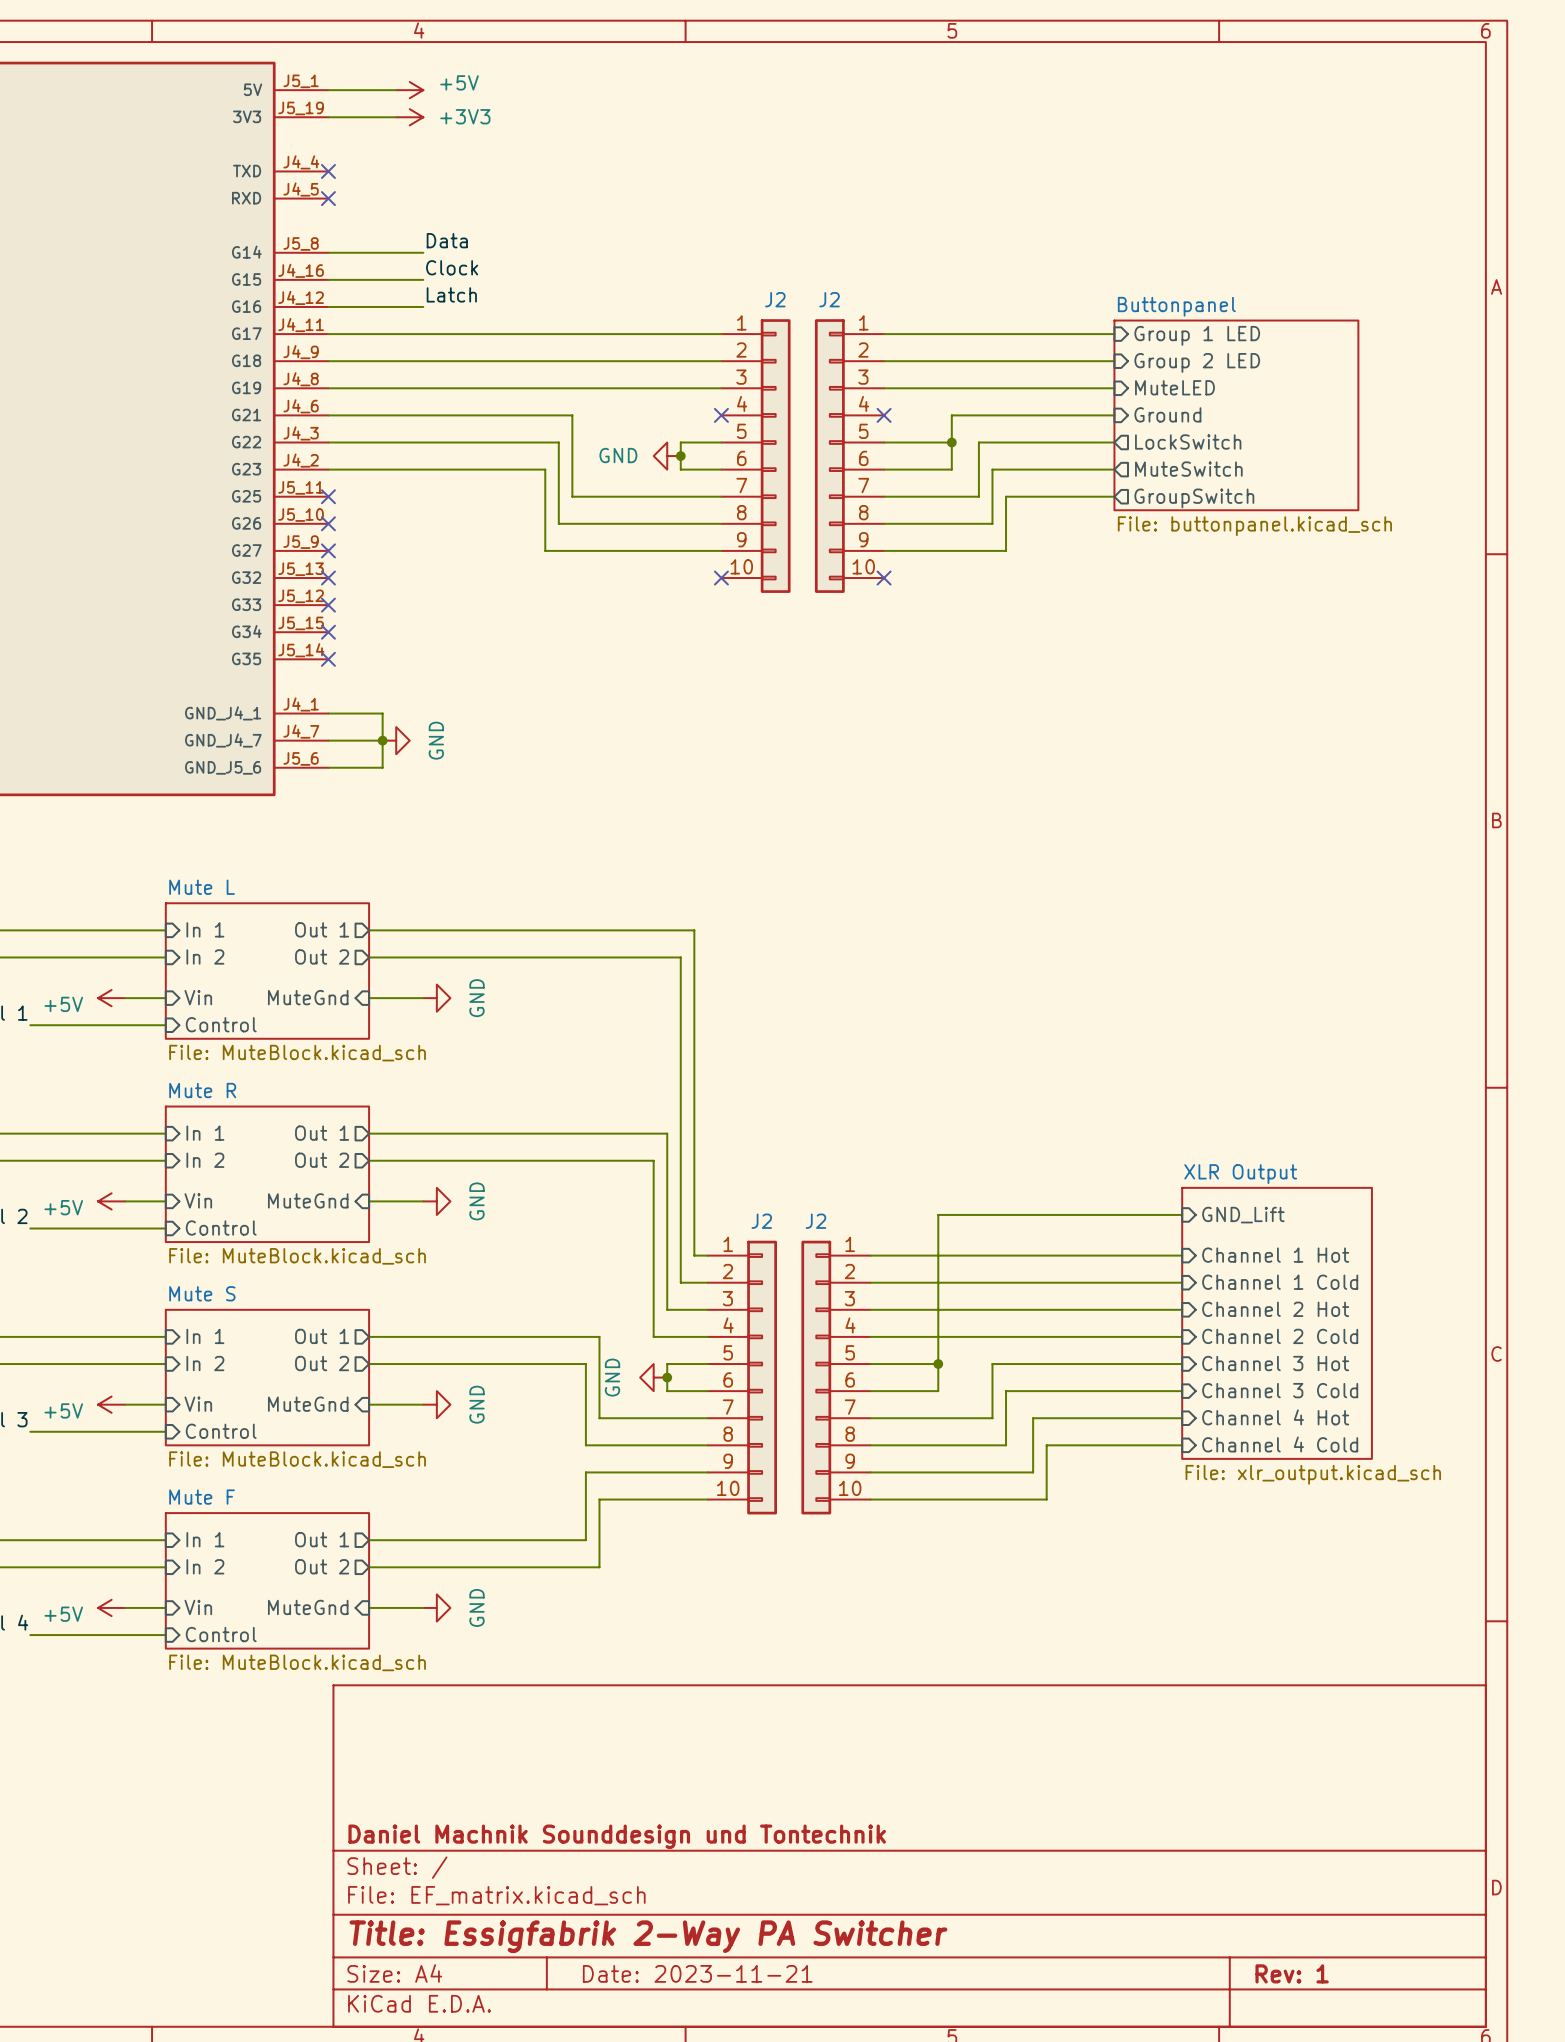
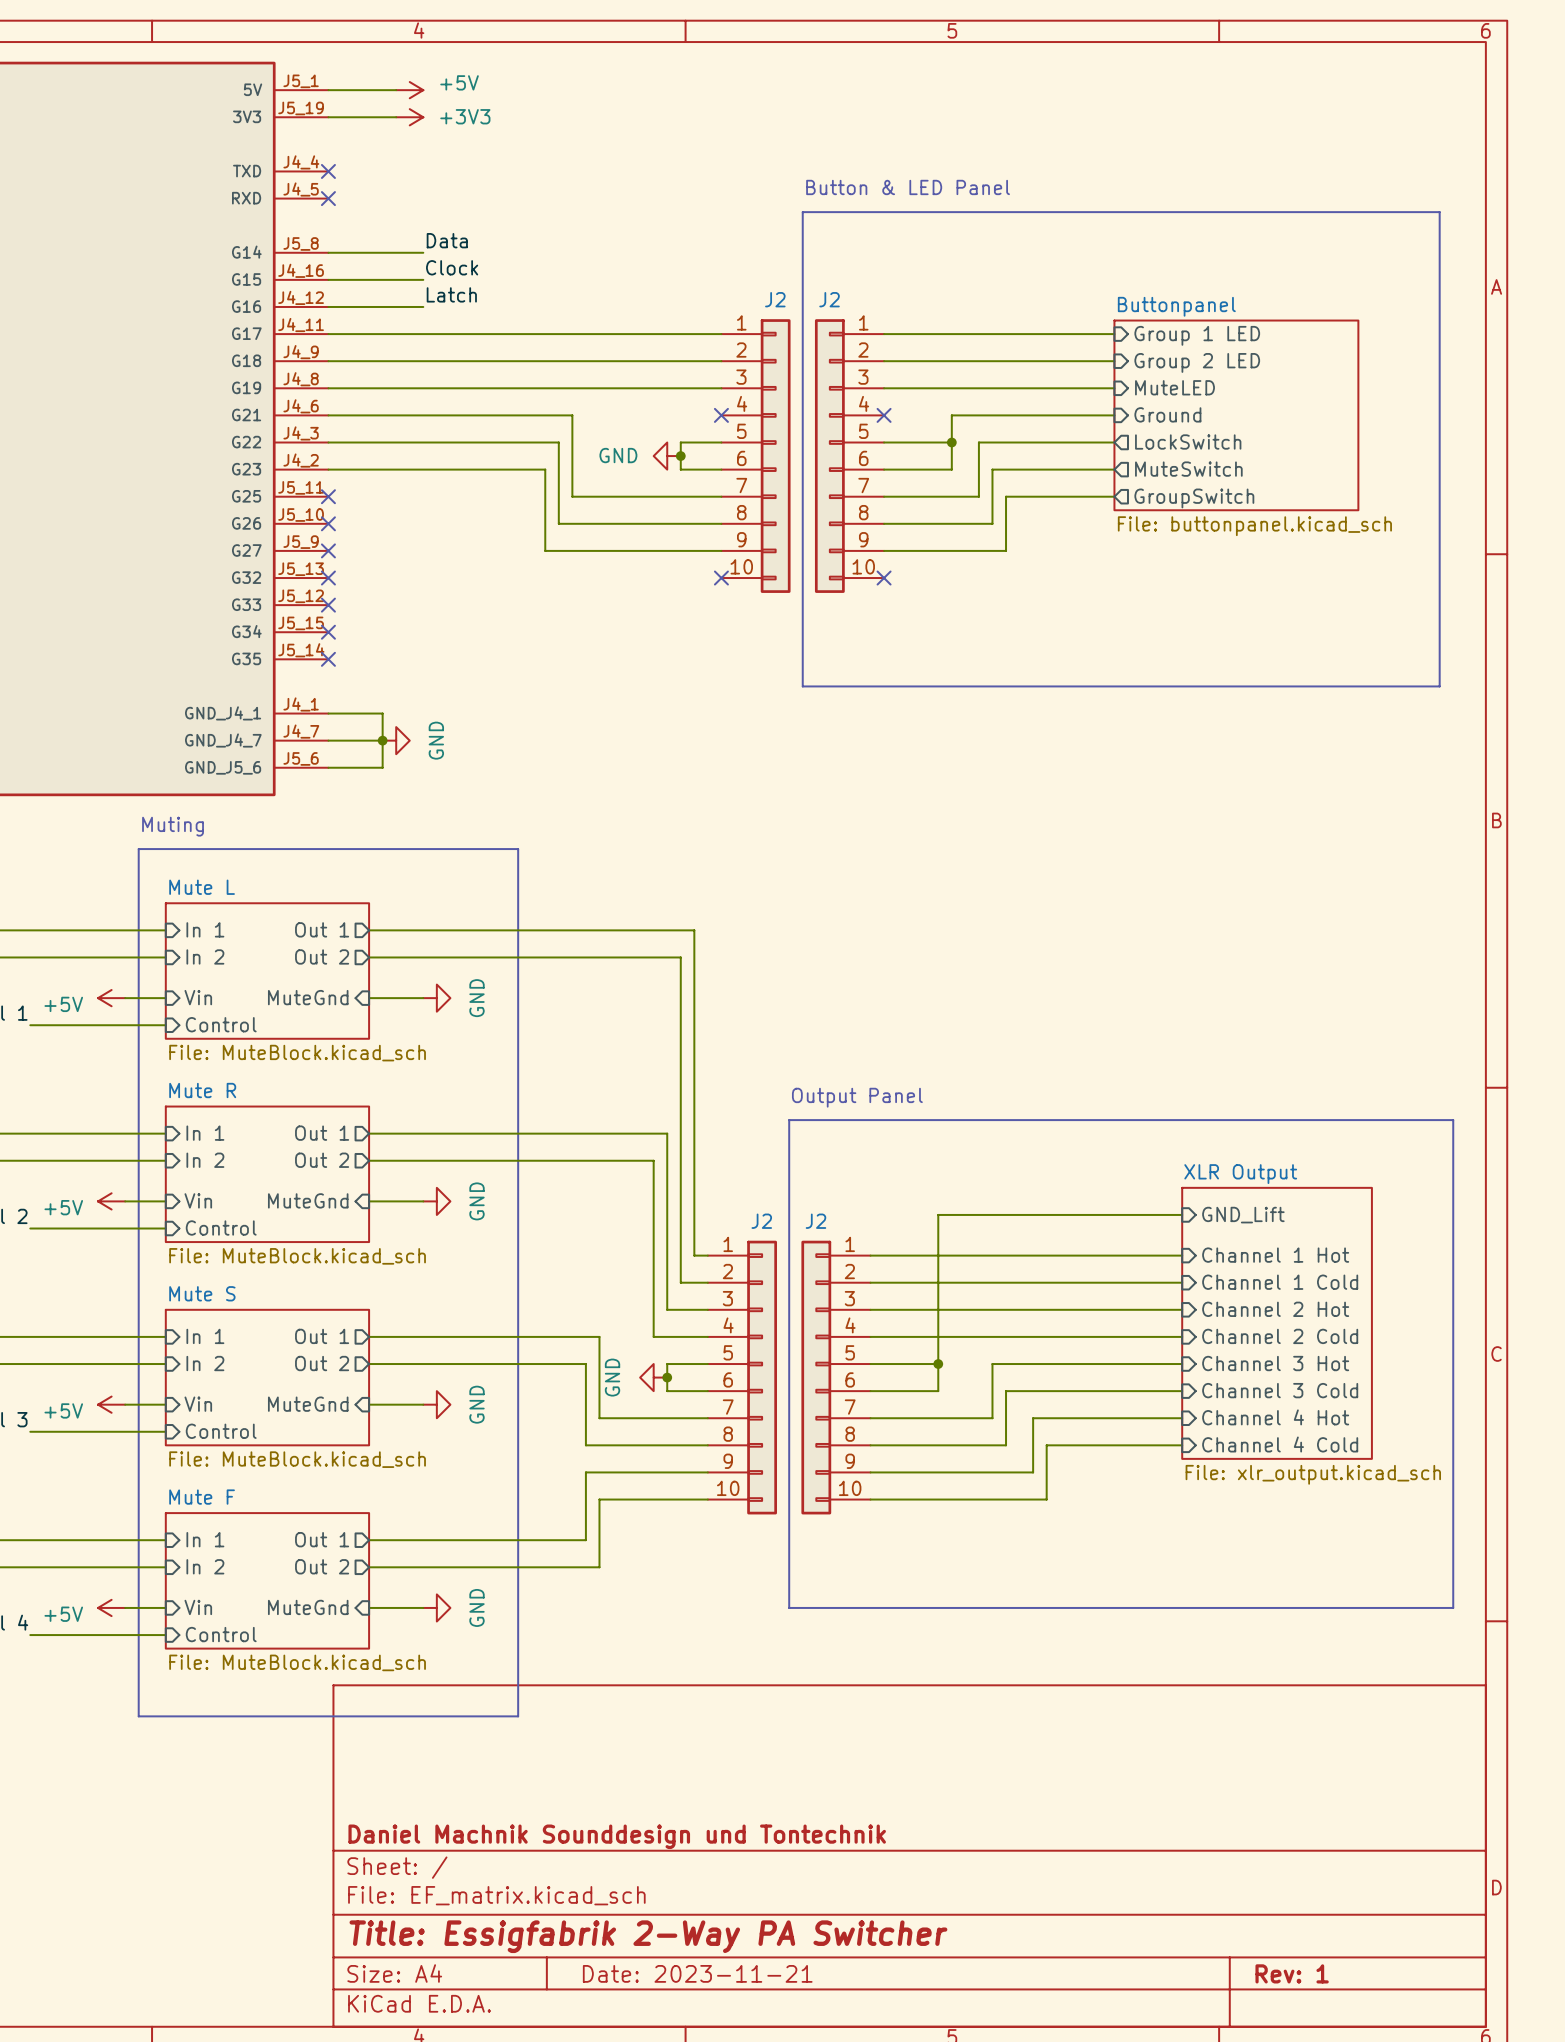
text: none -> Button & LED Panel (908, 187)
line: none -> (802, 212) (802, 686) (1439, 686) (1439, 212) (802, 212)
text: none -> Muting (173, 826)
line: none -> (138, 849) (138, 1716) (518, 1716) (518, 849) (138, 849)
text: none -> Output Panel (857, 1097)
line: none -> (789, 1120) (1453, 1120) (1453, 1607) (789, 1607) (789, 1120)

